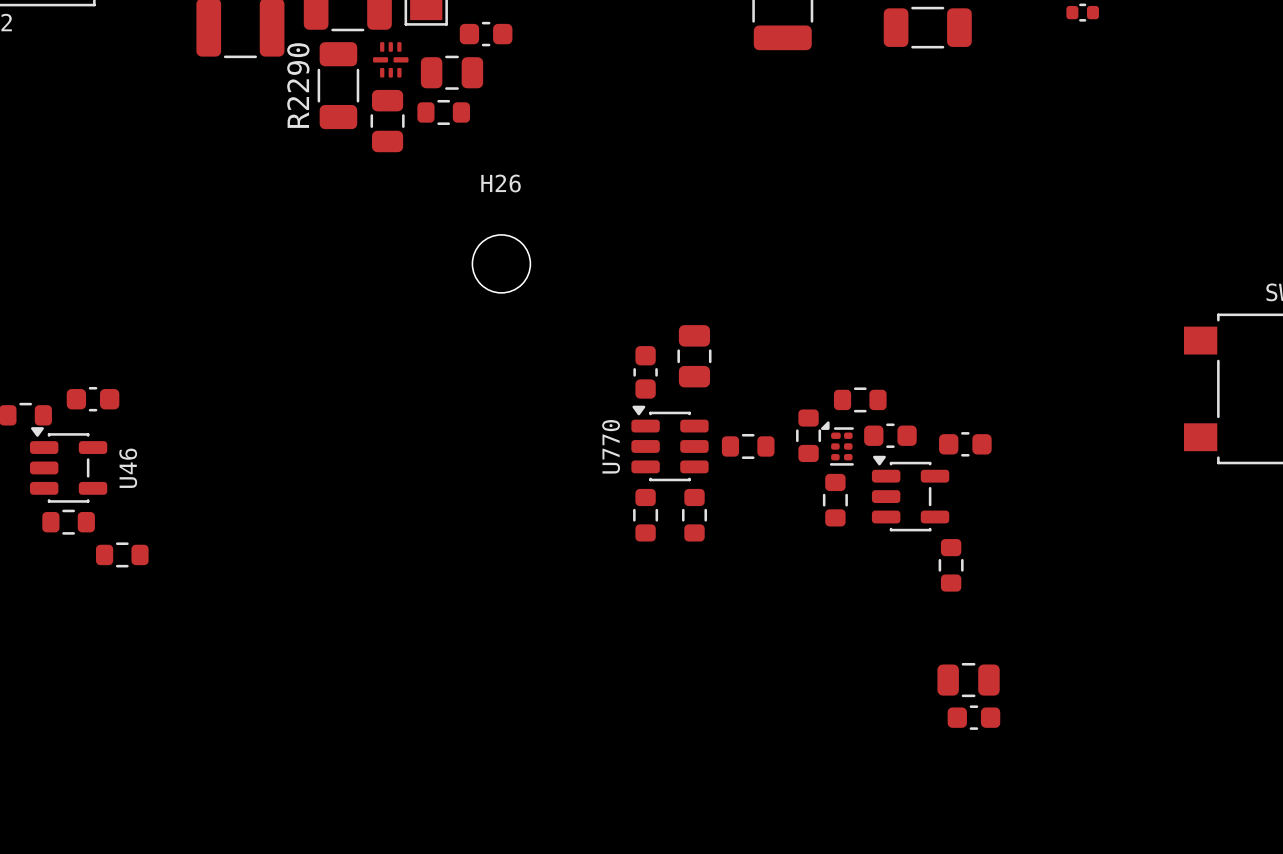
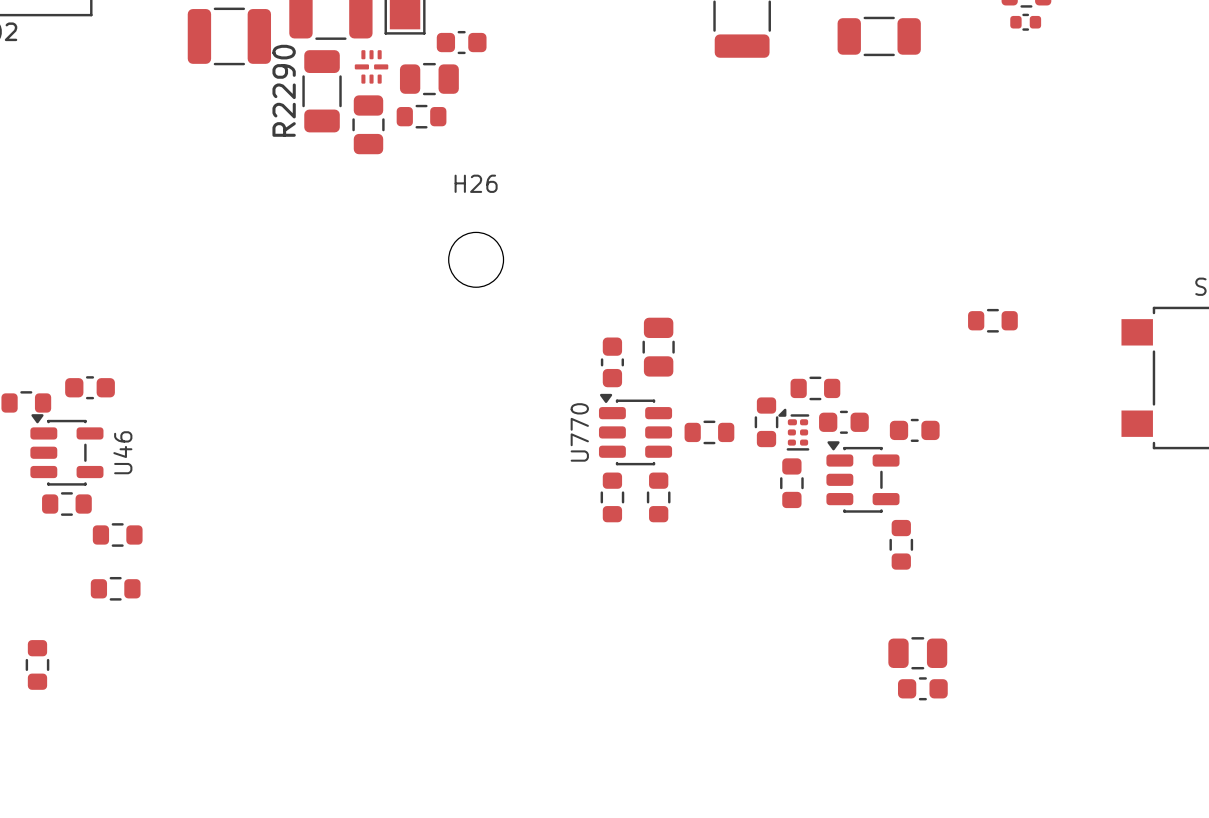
part: none -> (992, 320)
part: none -> (115, 588)
part: none -> (37, 664)

